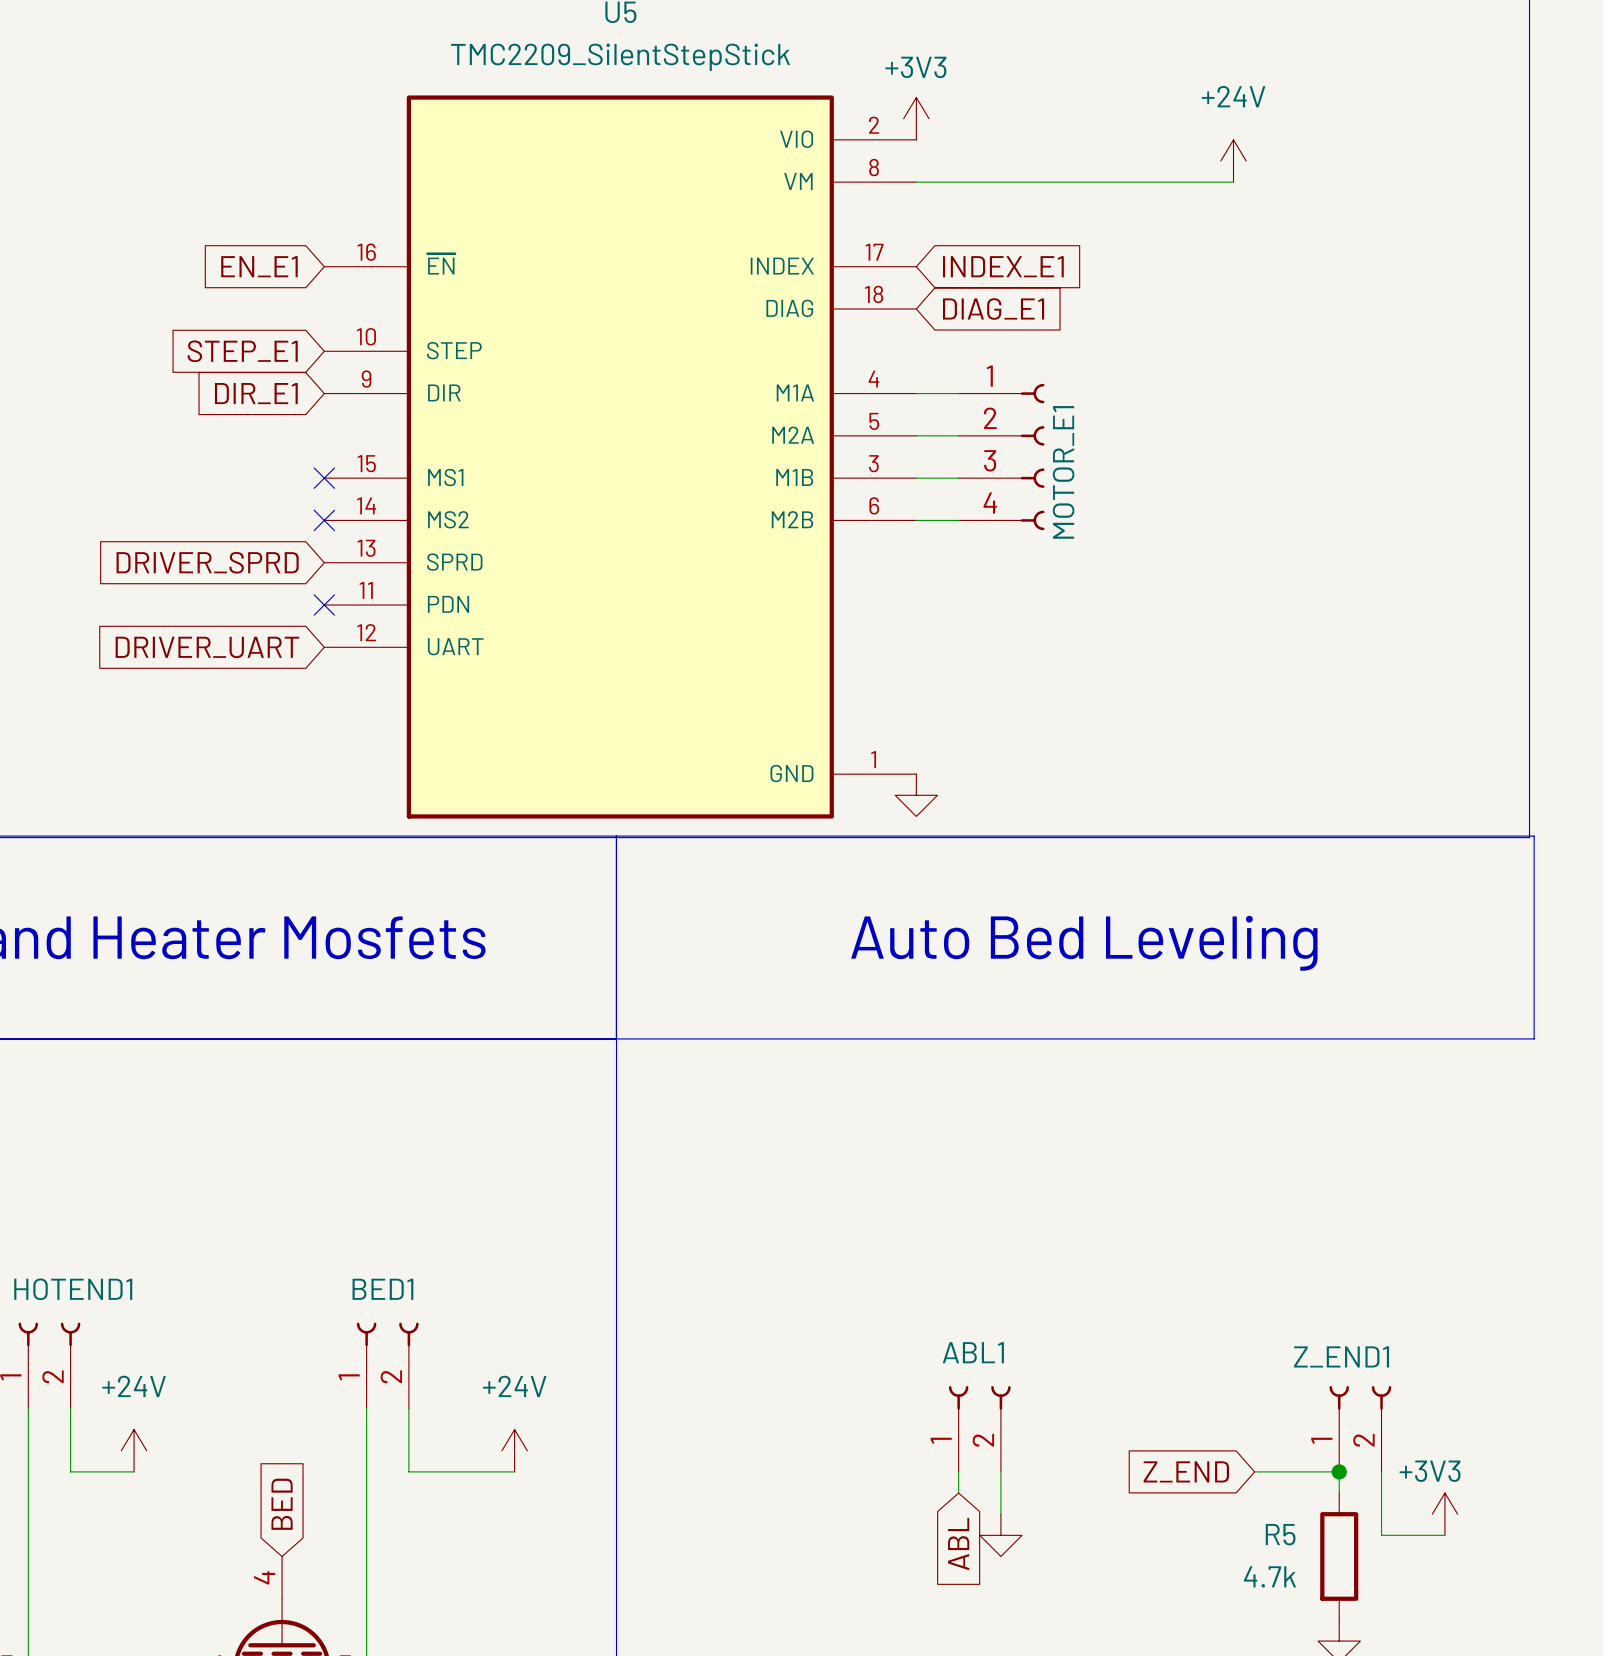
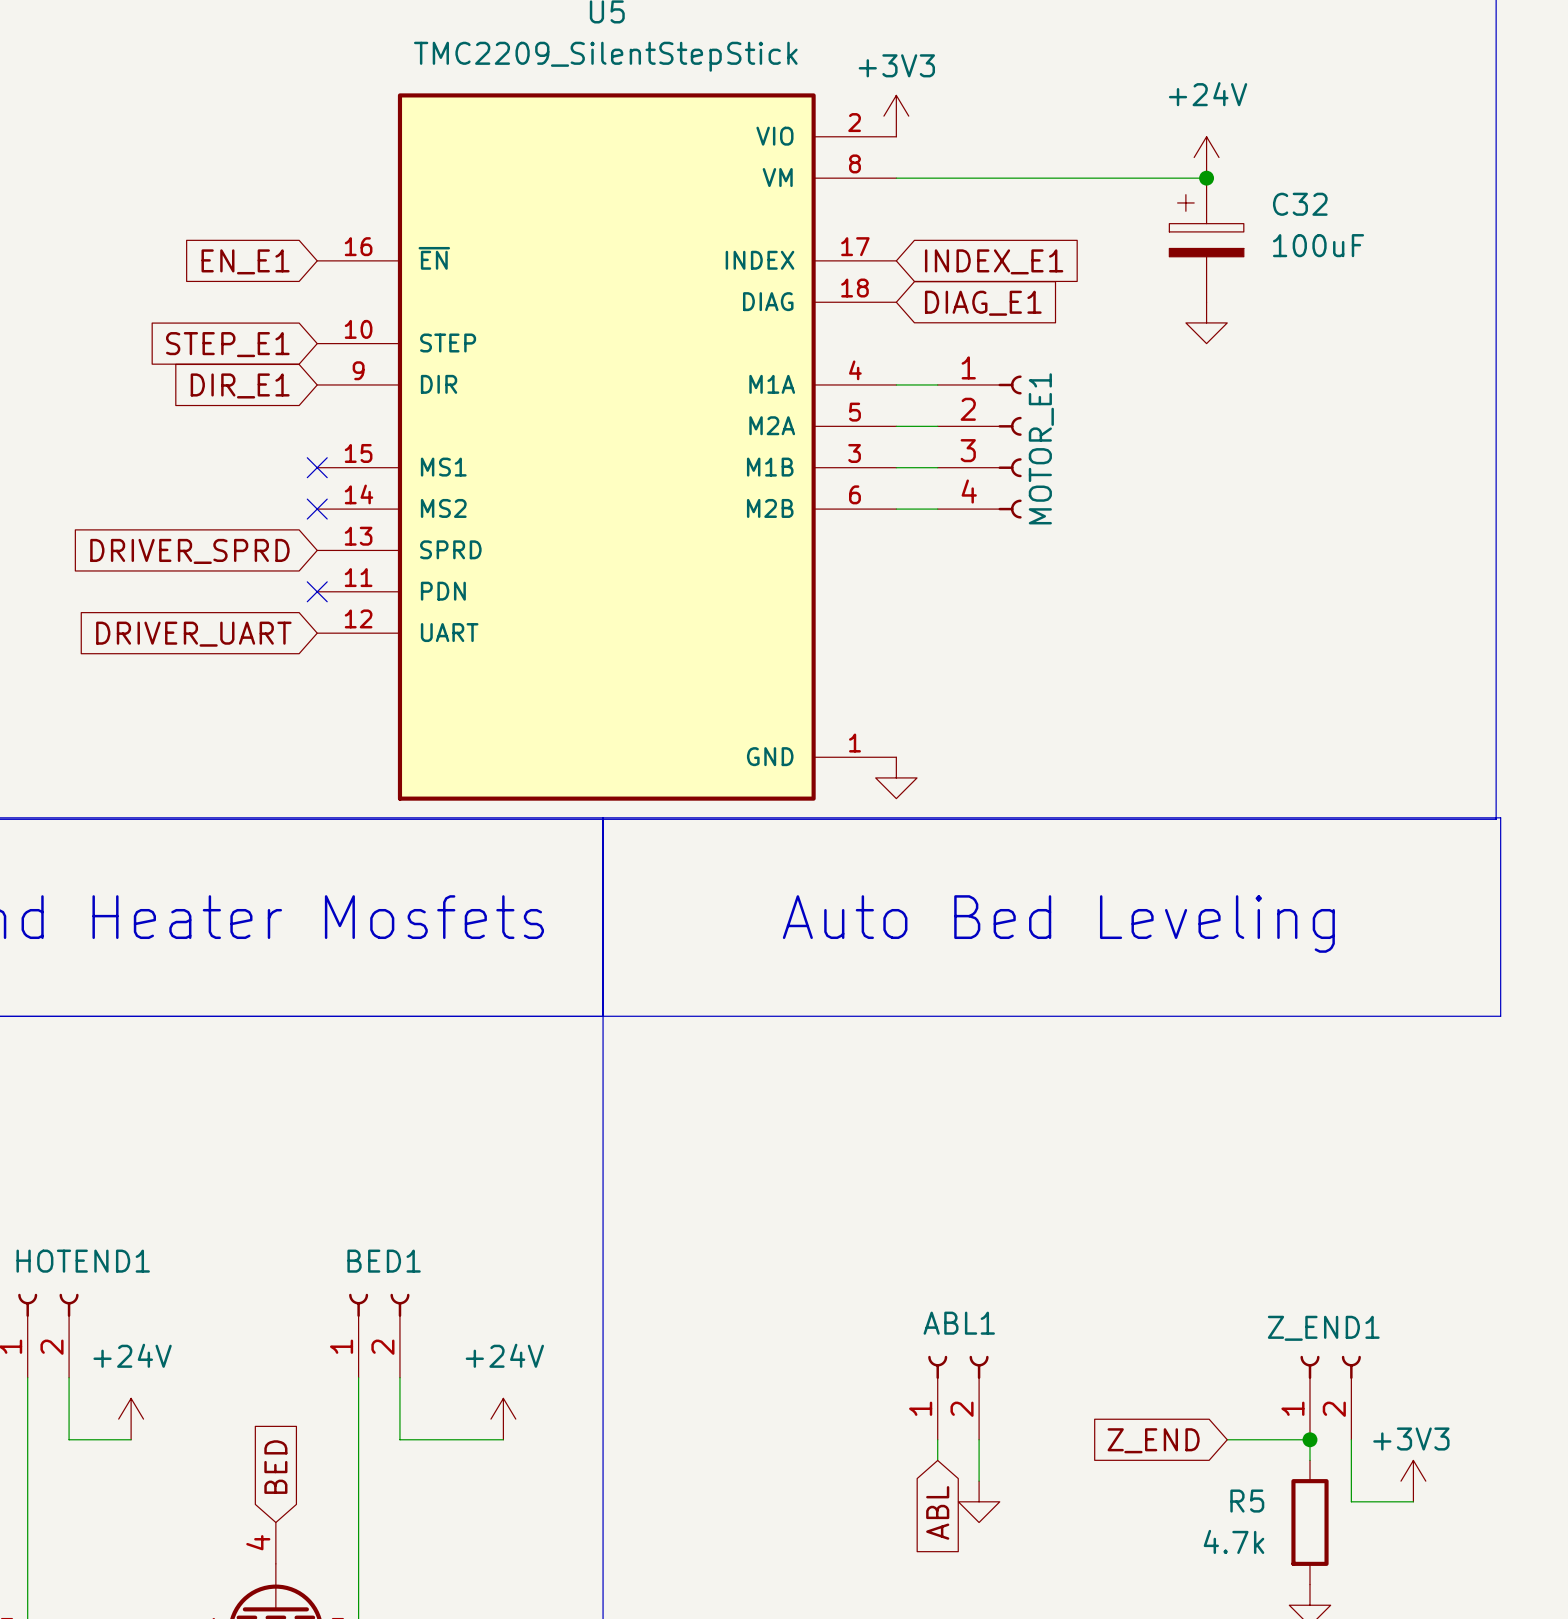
junction: none -> (1206, 178)
C32: none -> 100uF (1206, 240)
power symbol: none -> (1206, 322)

